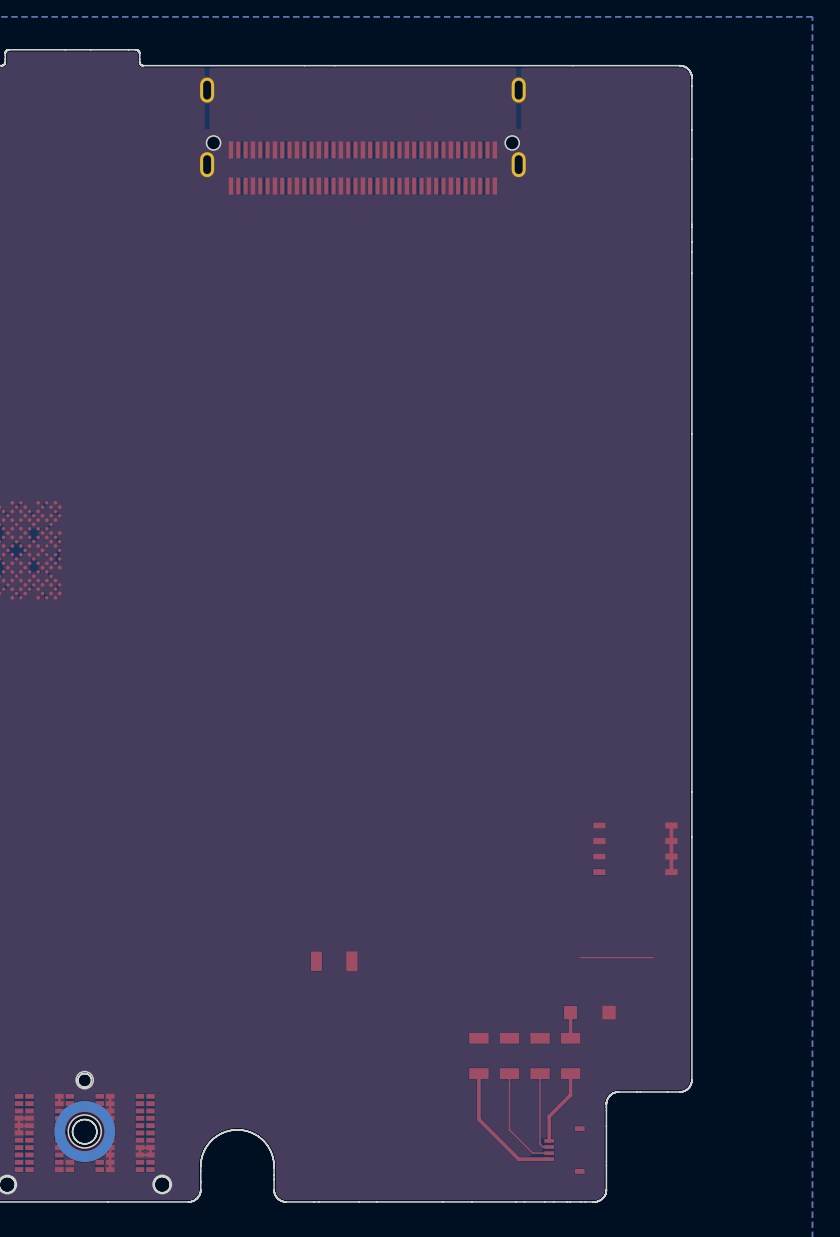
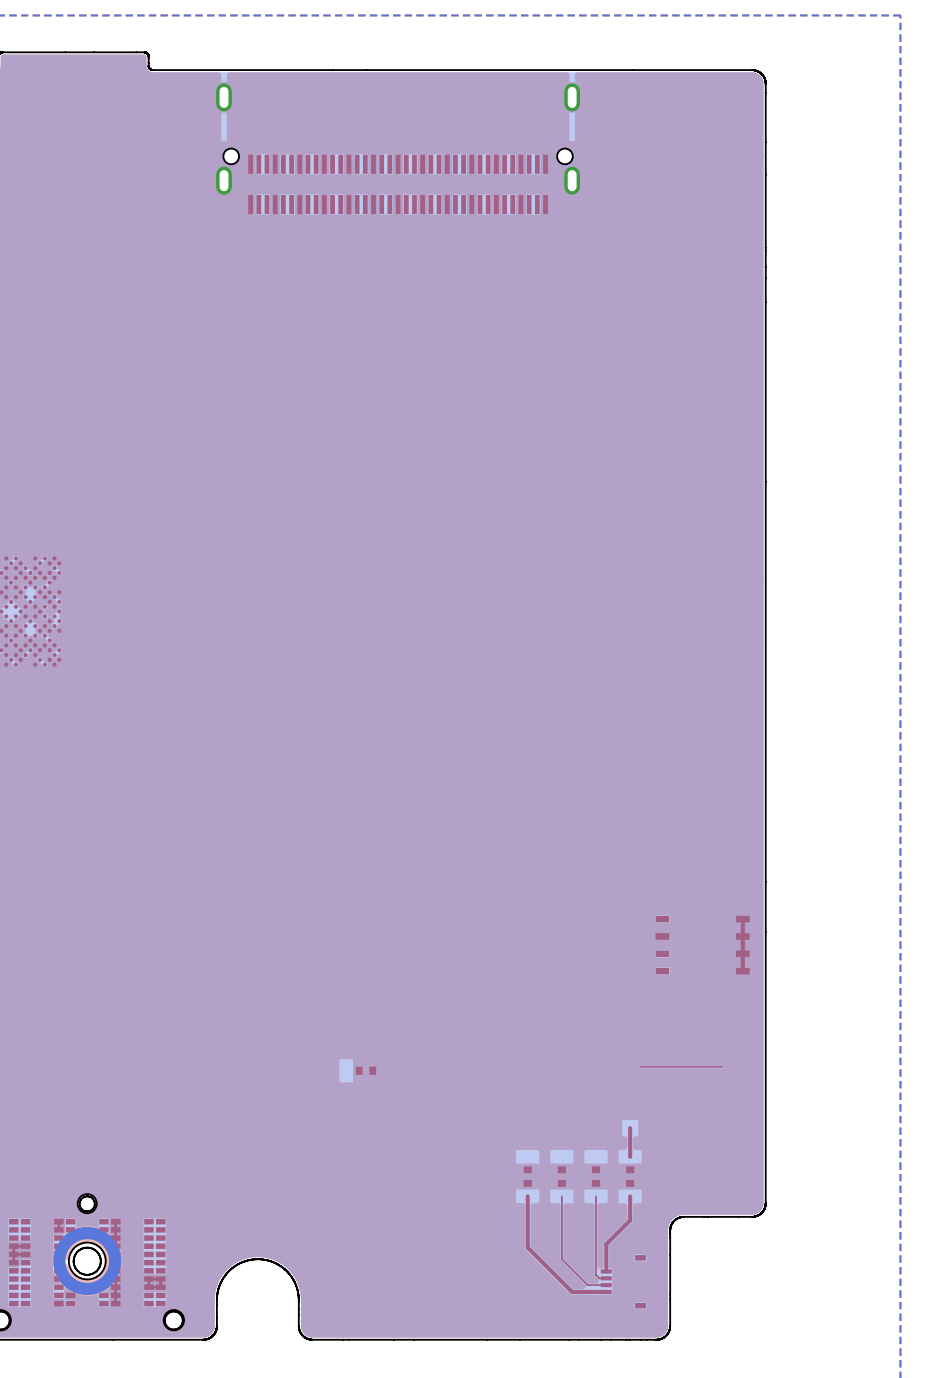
part footprint: [310, 951, 358, 972] -> [355, 1066, 377, 1075]
part: (589, 1012) -> none
part footprint: [469, 1032, 489, 1080] -> [523, 1166, 532, 1187]
part footprint: [499, 1032, 520, 1080] -> [557, 1166, 566, 1187]
part footprint: [530, 1032, 550, 1080] -> [591, 1166, 601, 1187]
part footprint: [560, 1032, 581, 1080] -> [626, 1166, 635, 1187]

